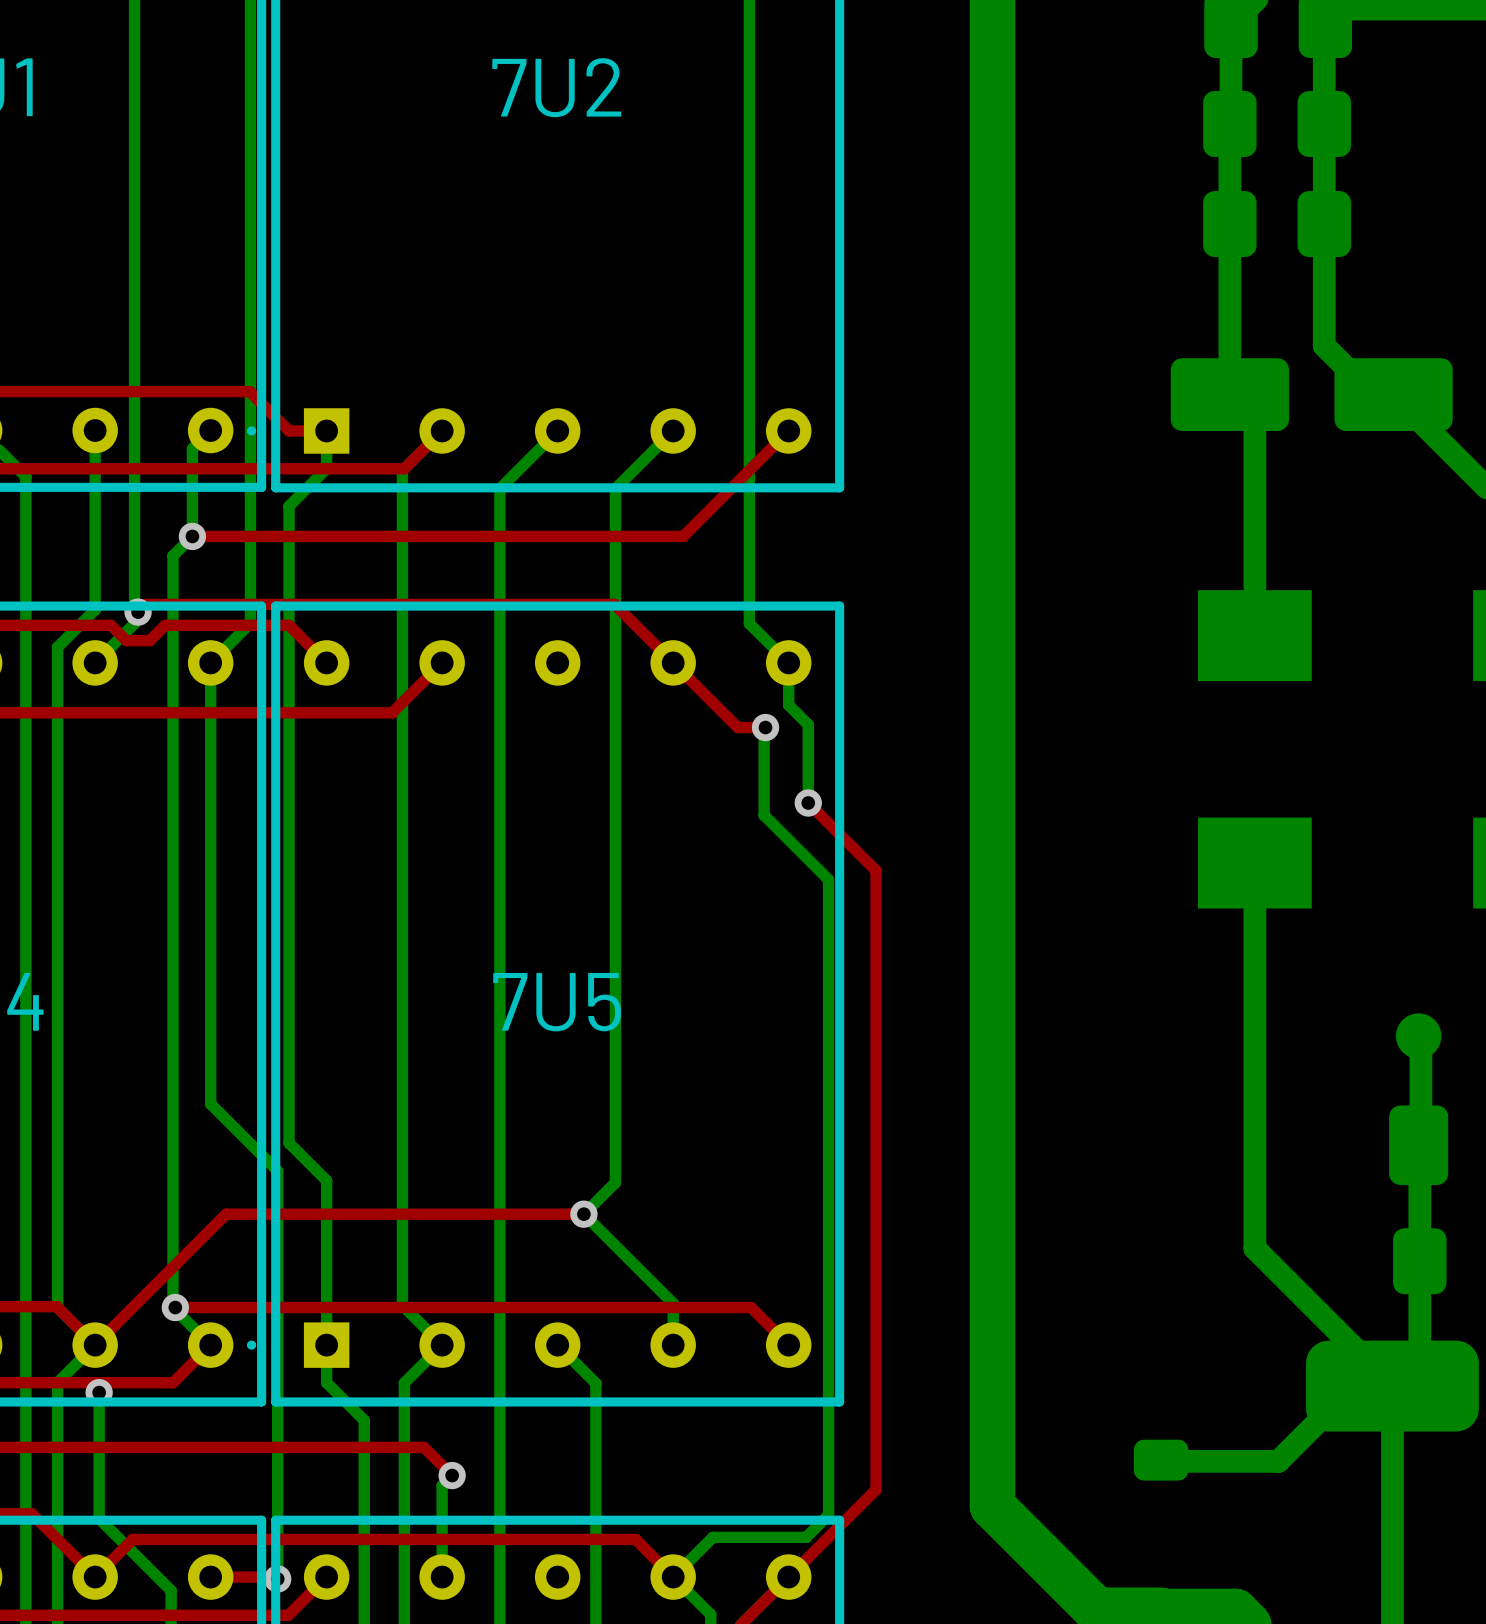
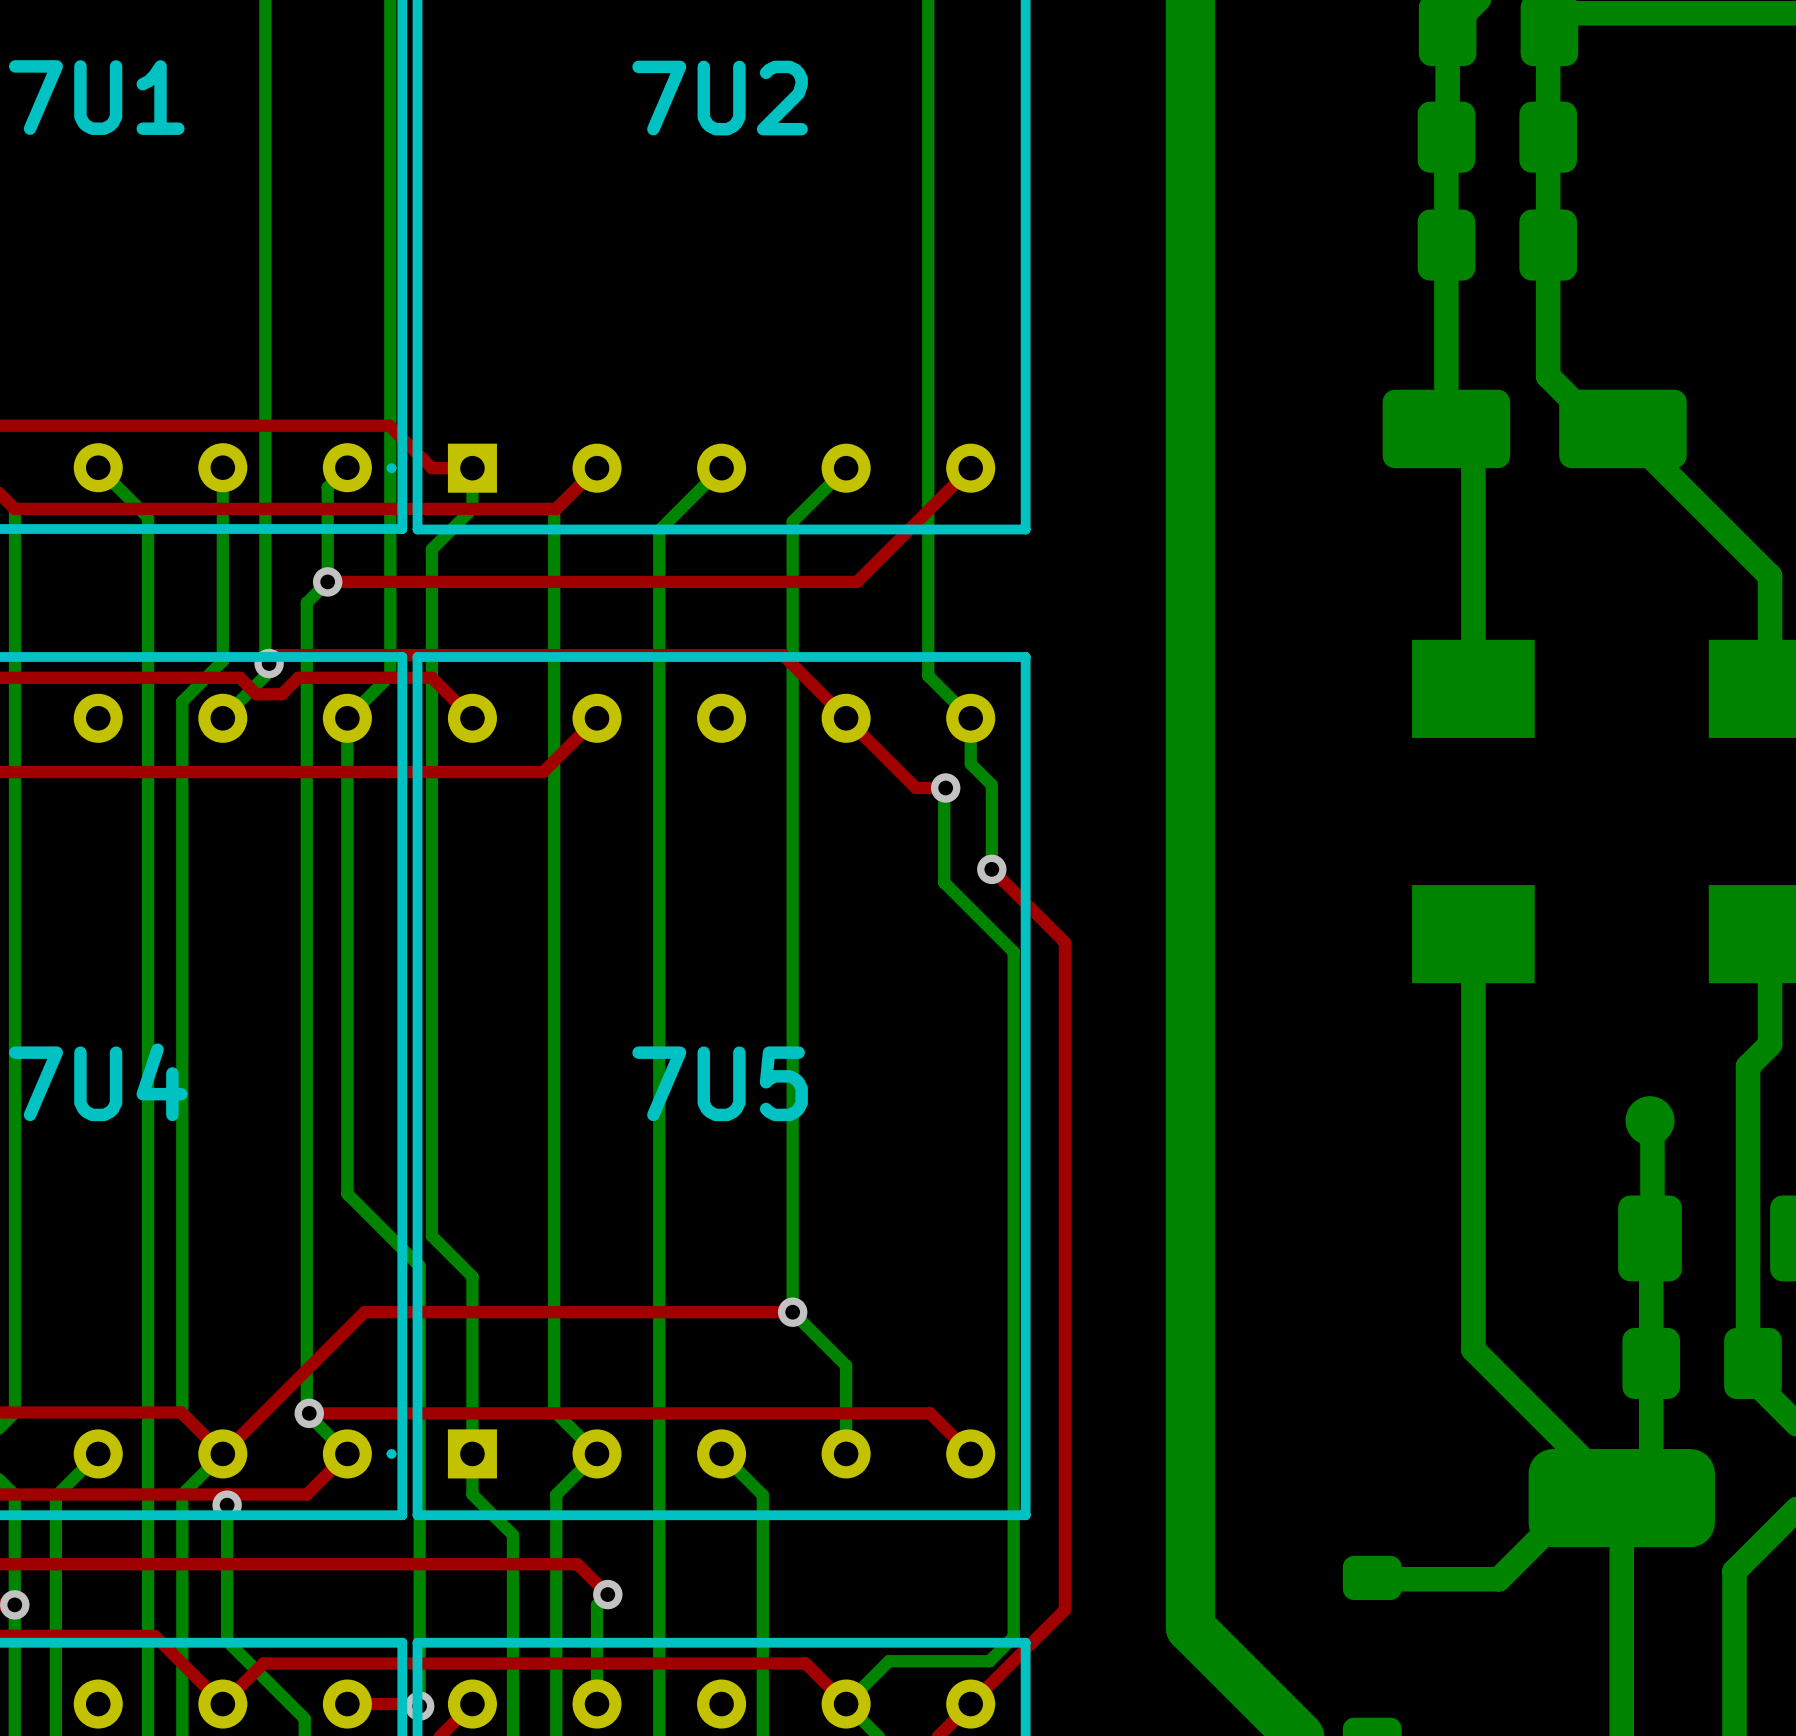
bottom track: (623, 480) (615, 488) (615, 1182) (583, 1214) (673, 1303) -> (792, 521) (792, 1312) (846, 1365) (846, 1409)
top track: (226, 1214) (583, 1214) -> (364, 1312) (792, 1312)
via position: (583, 1214) -> (792, 1312)

